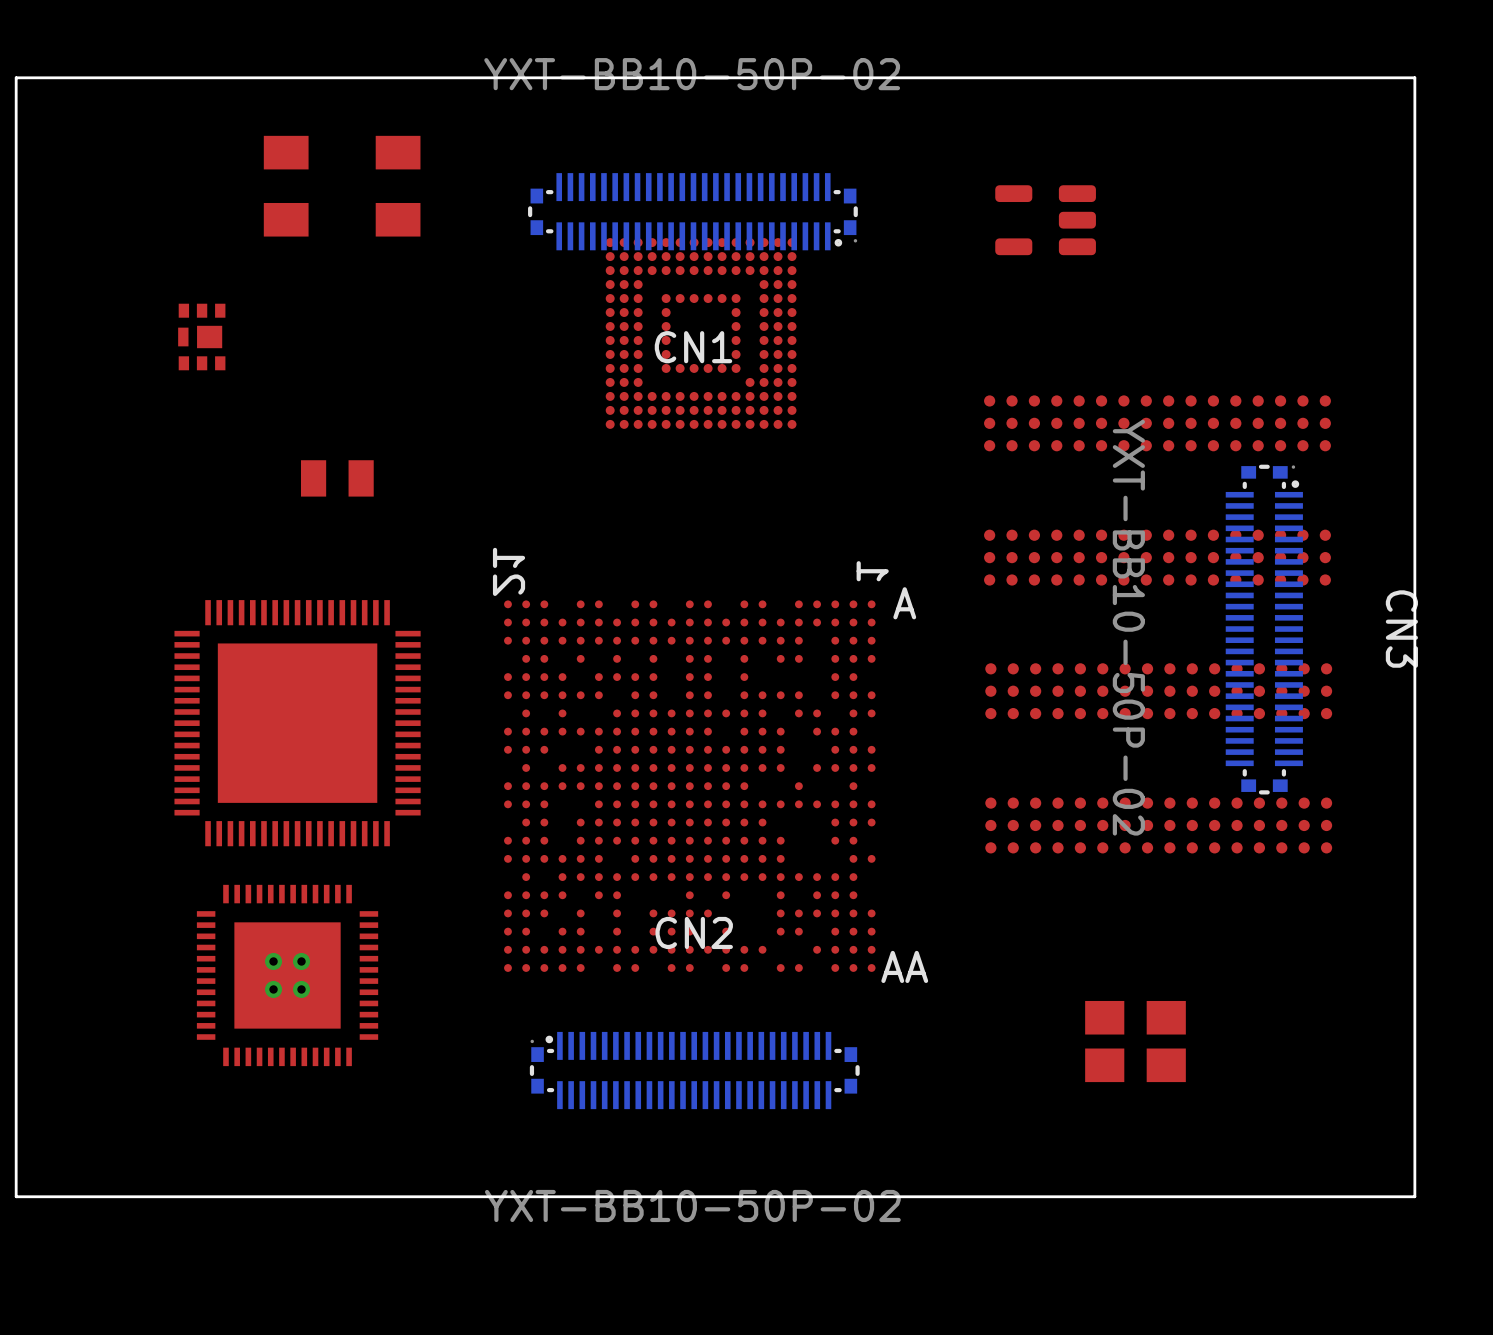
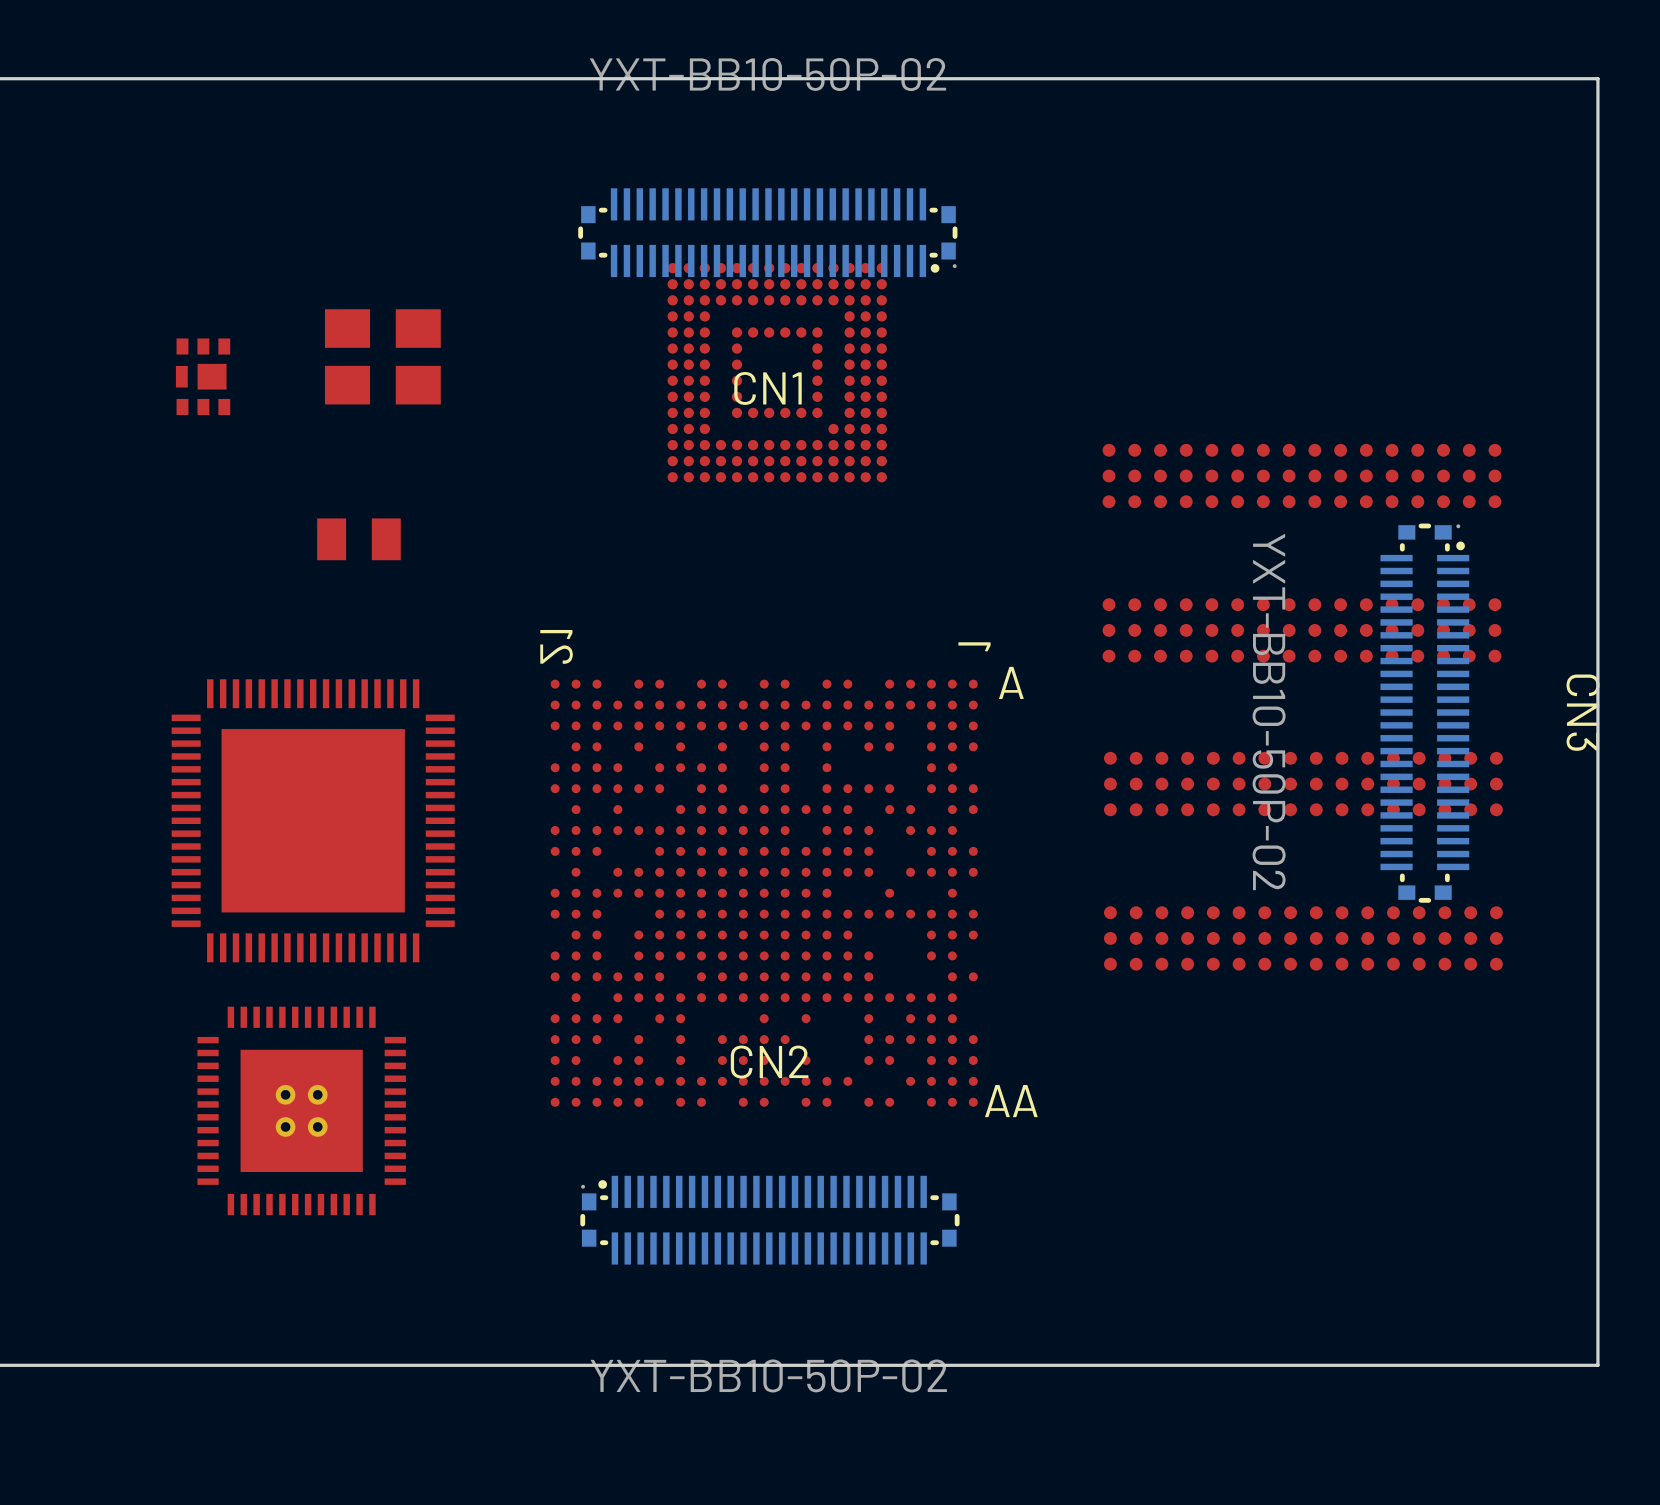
part: (342, 186) -> none
part: (1045, 220) -> none
part: none -> (382, 356)
part: (1135, 1041) -> none

